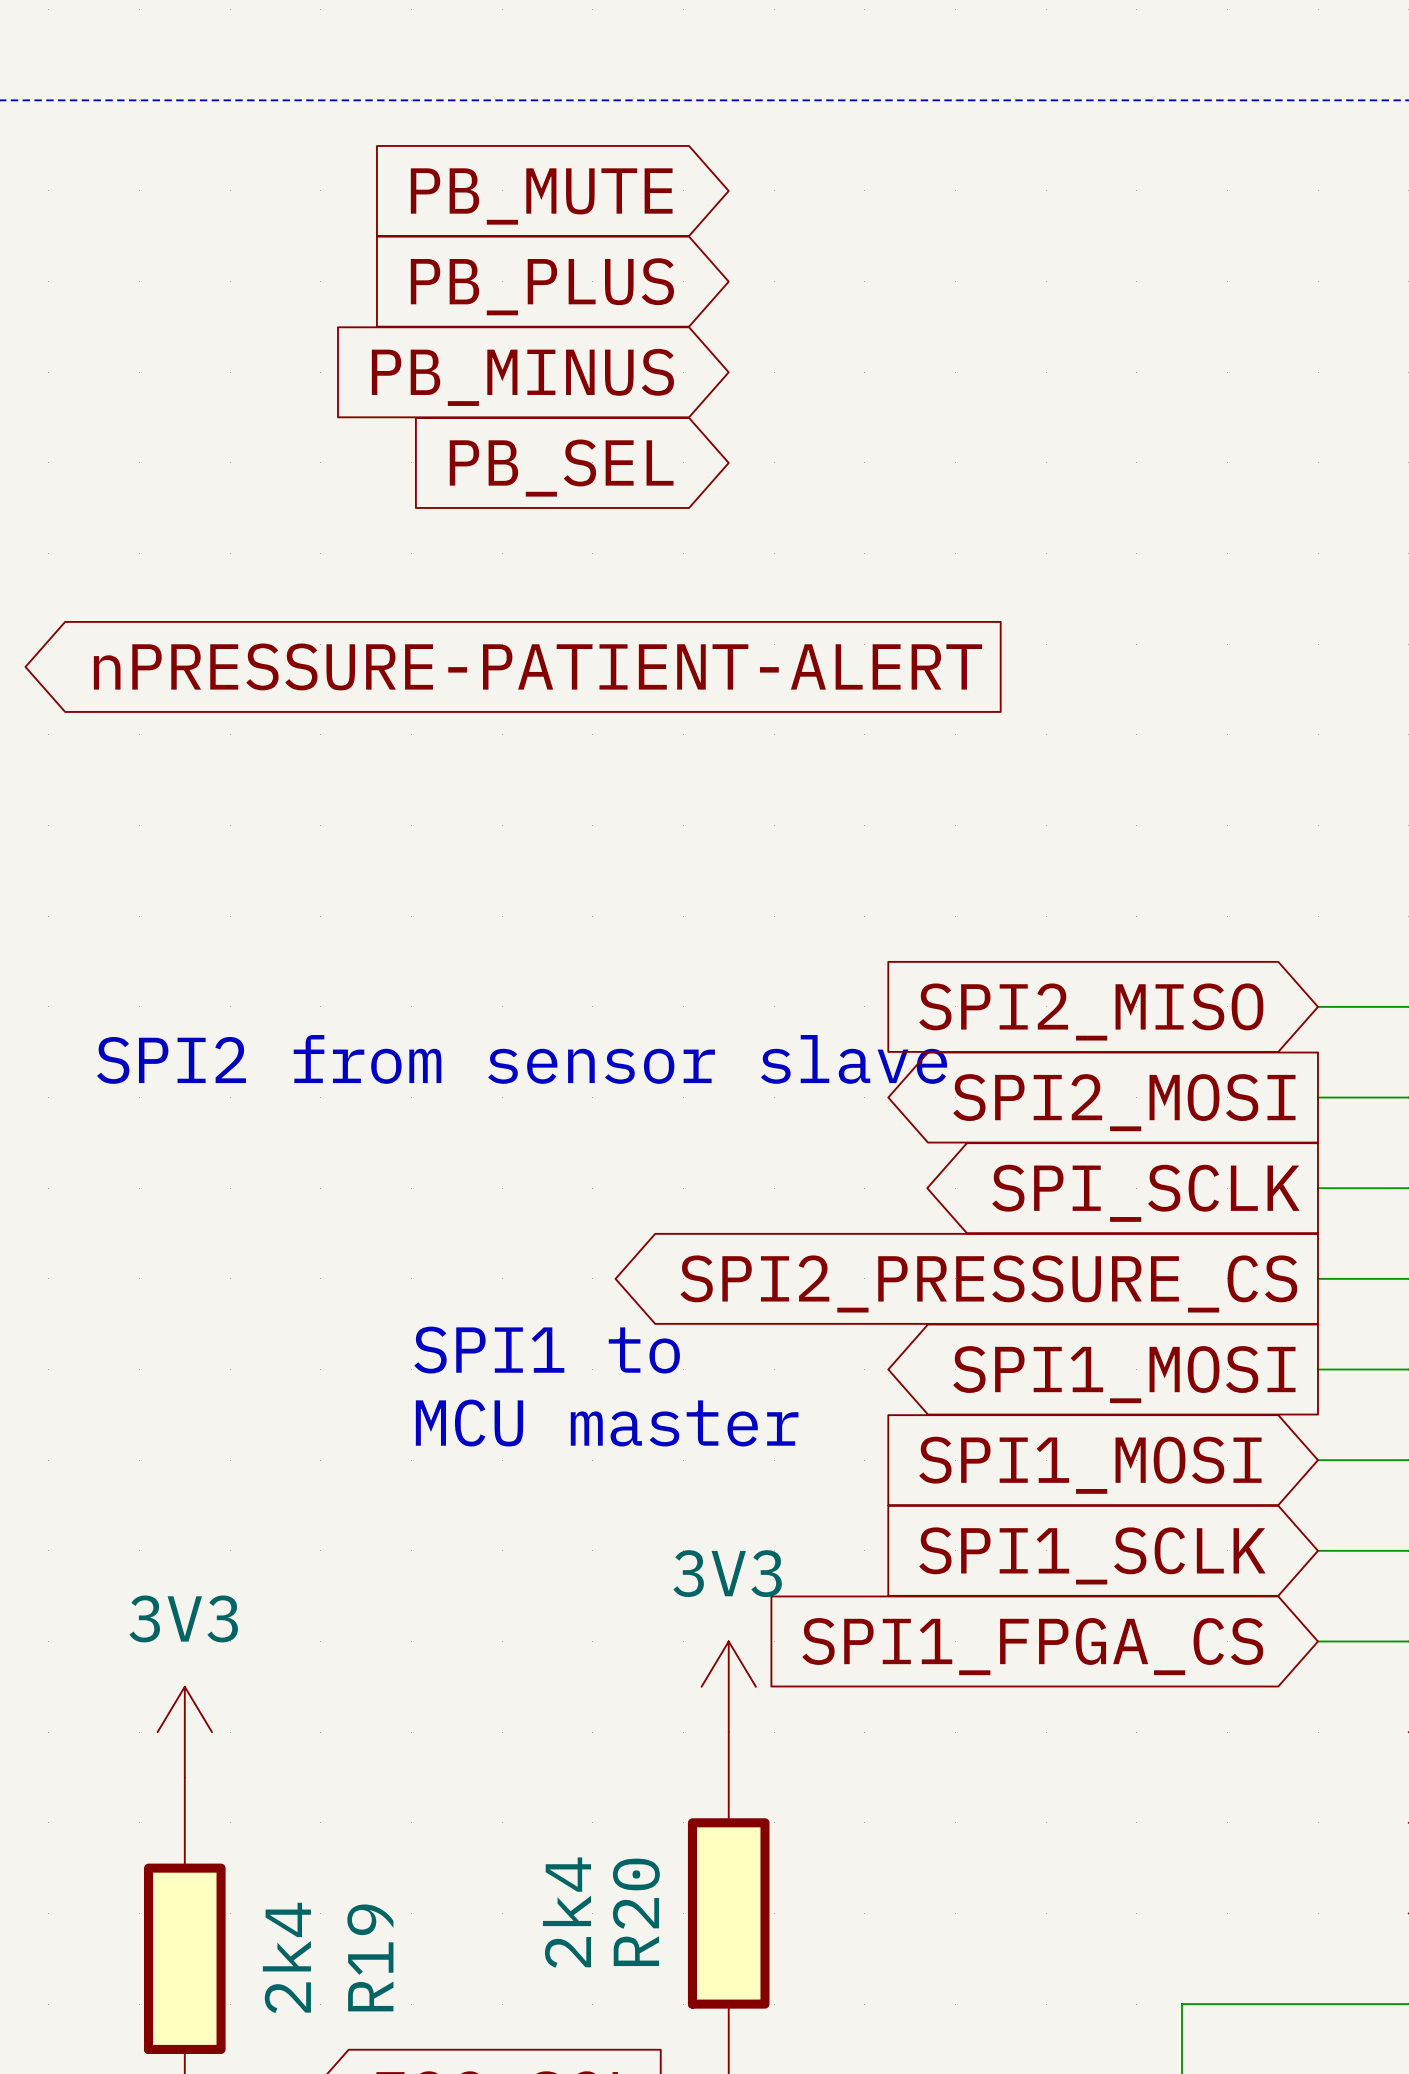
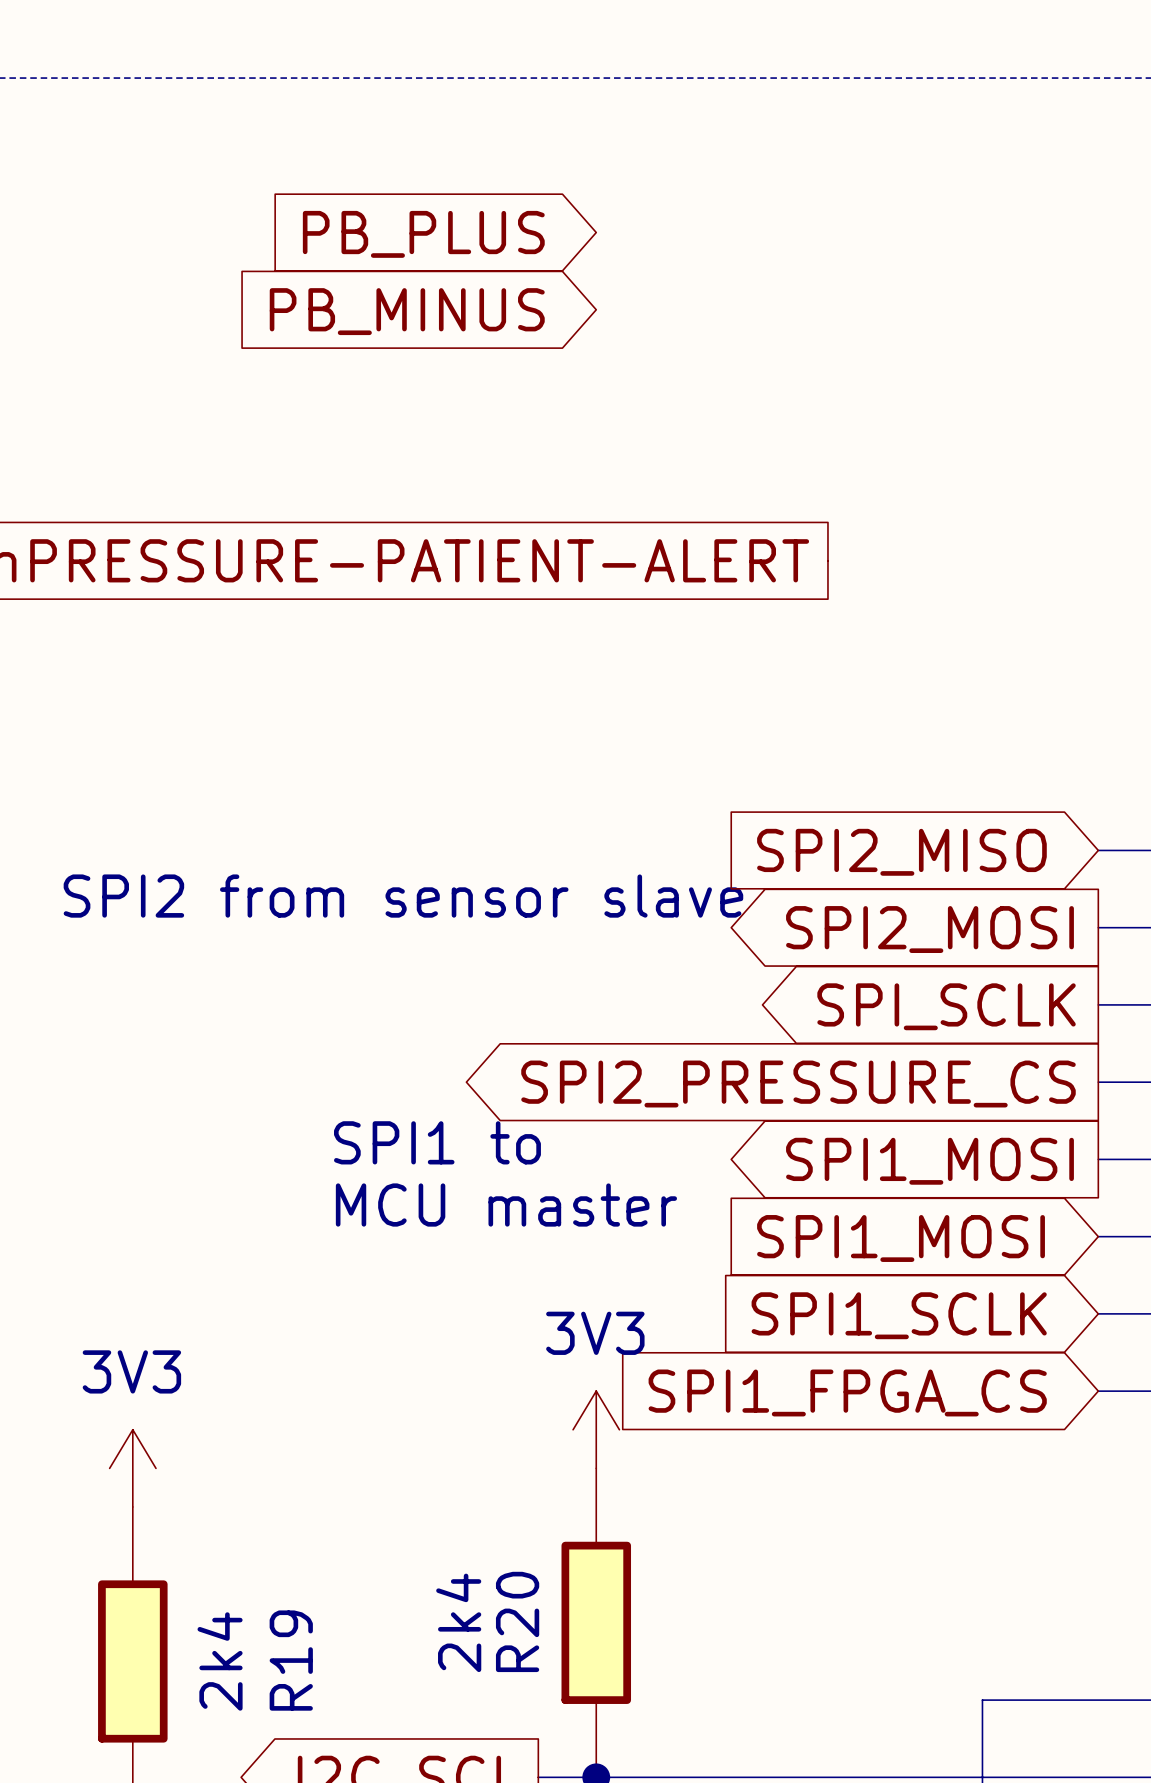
global label: PB_MUTE (541, 196) -> none
global label: PB_SEL (561, 468) -> none

